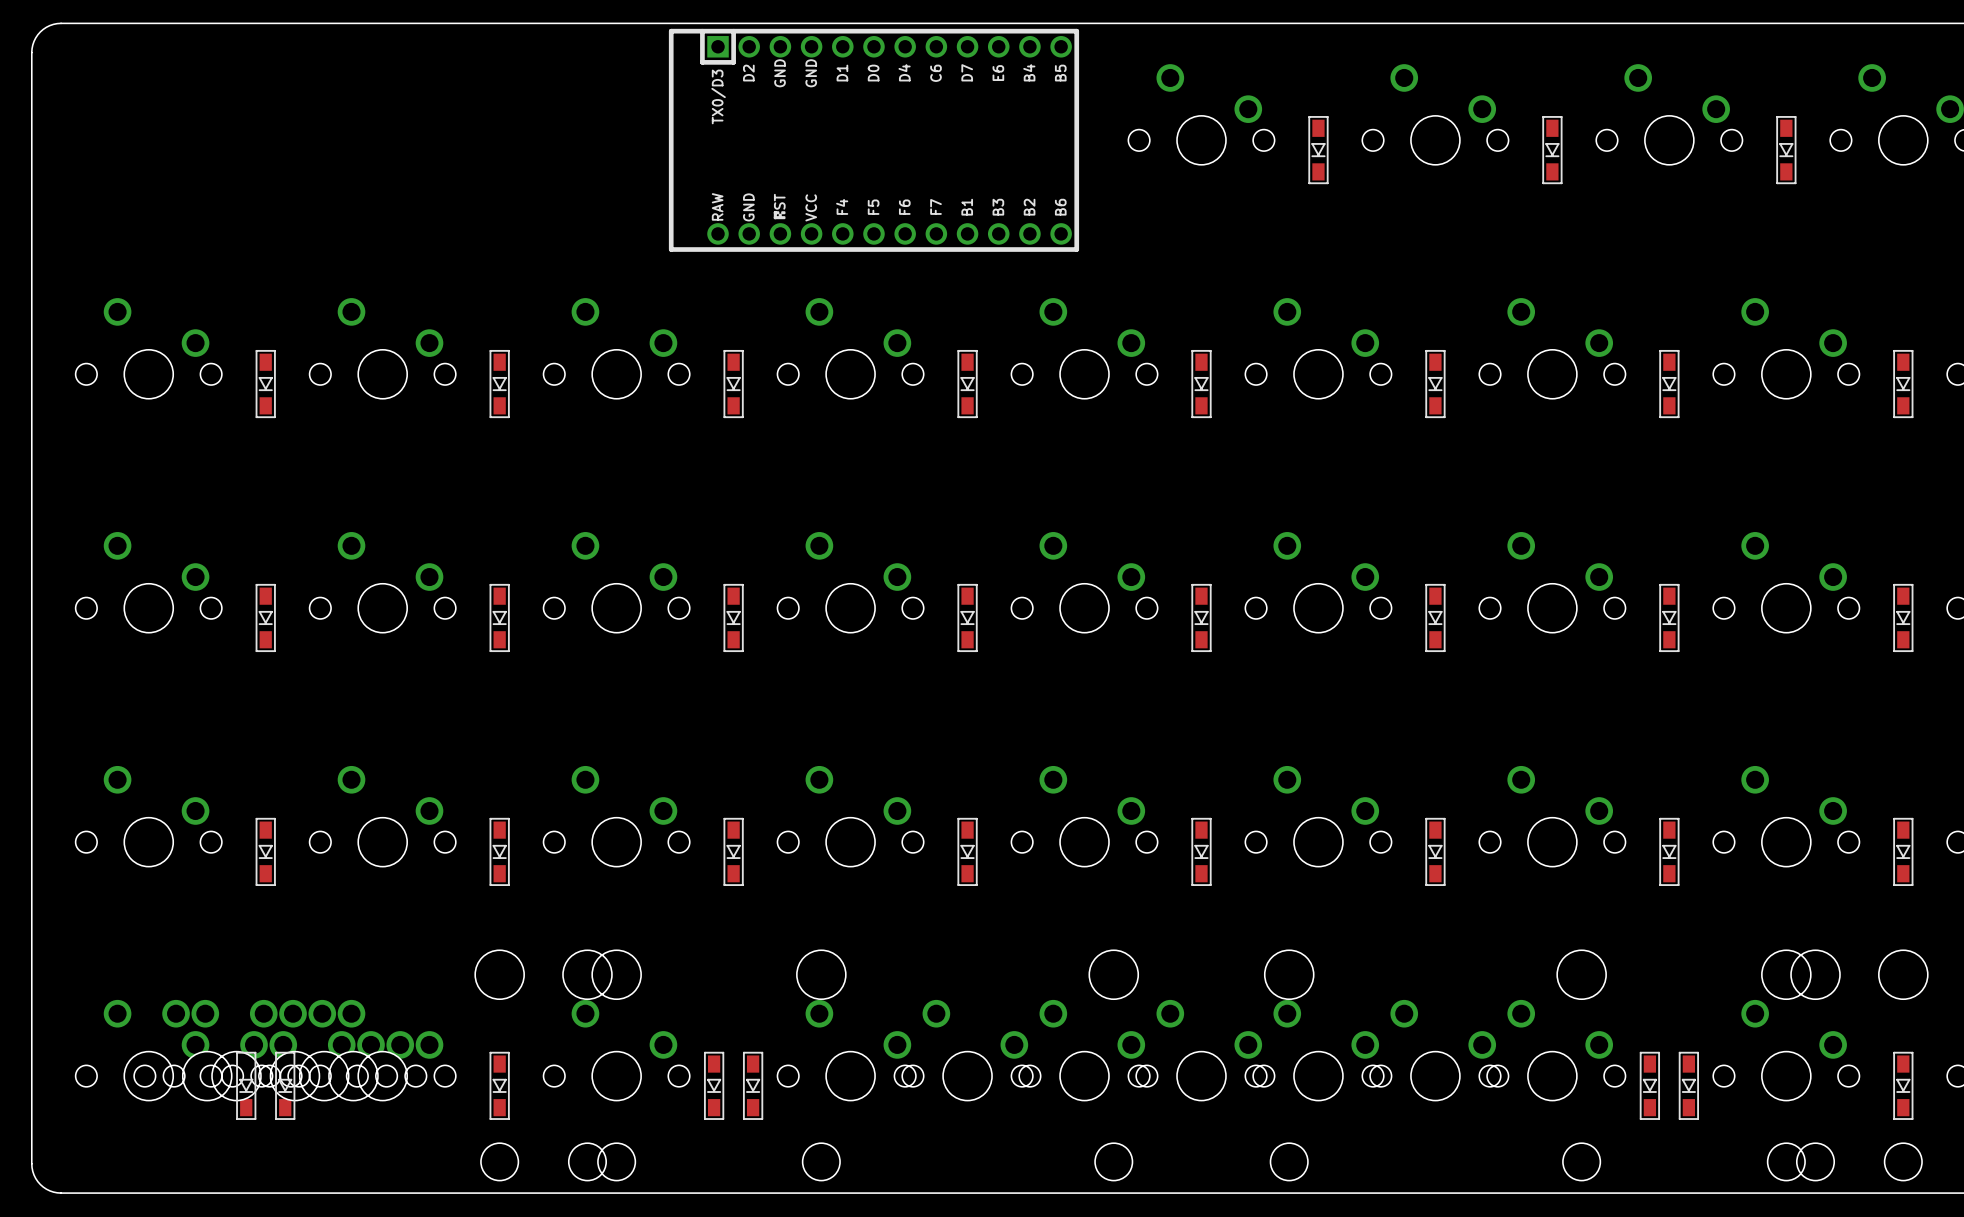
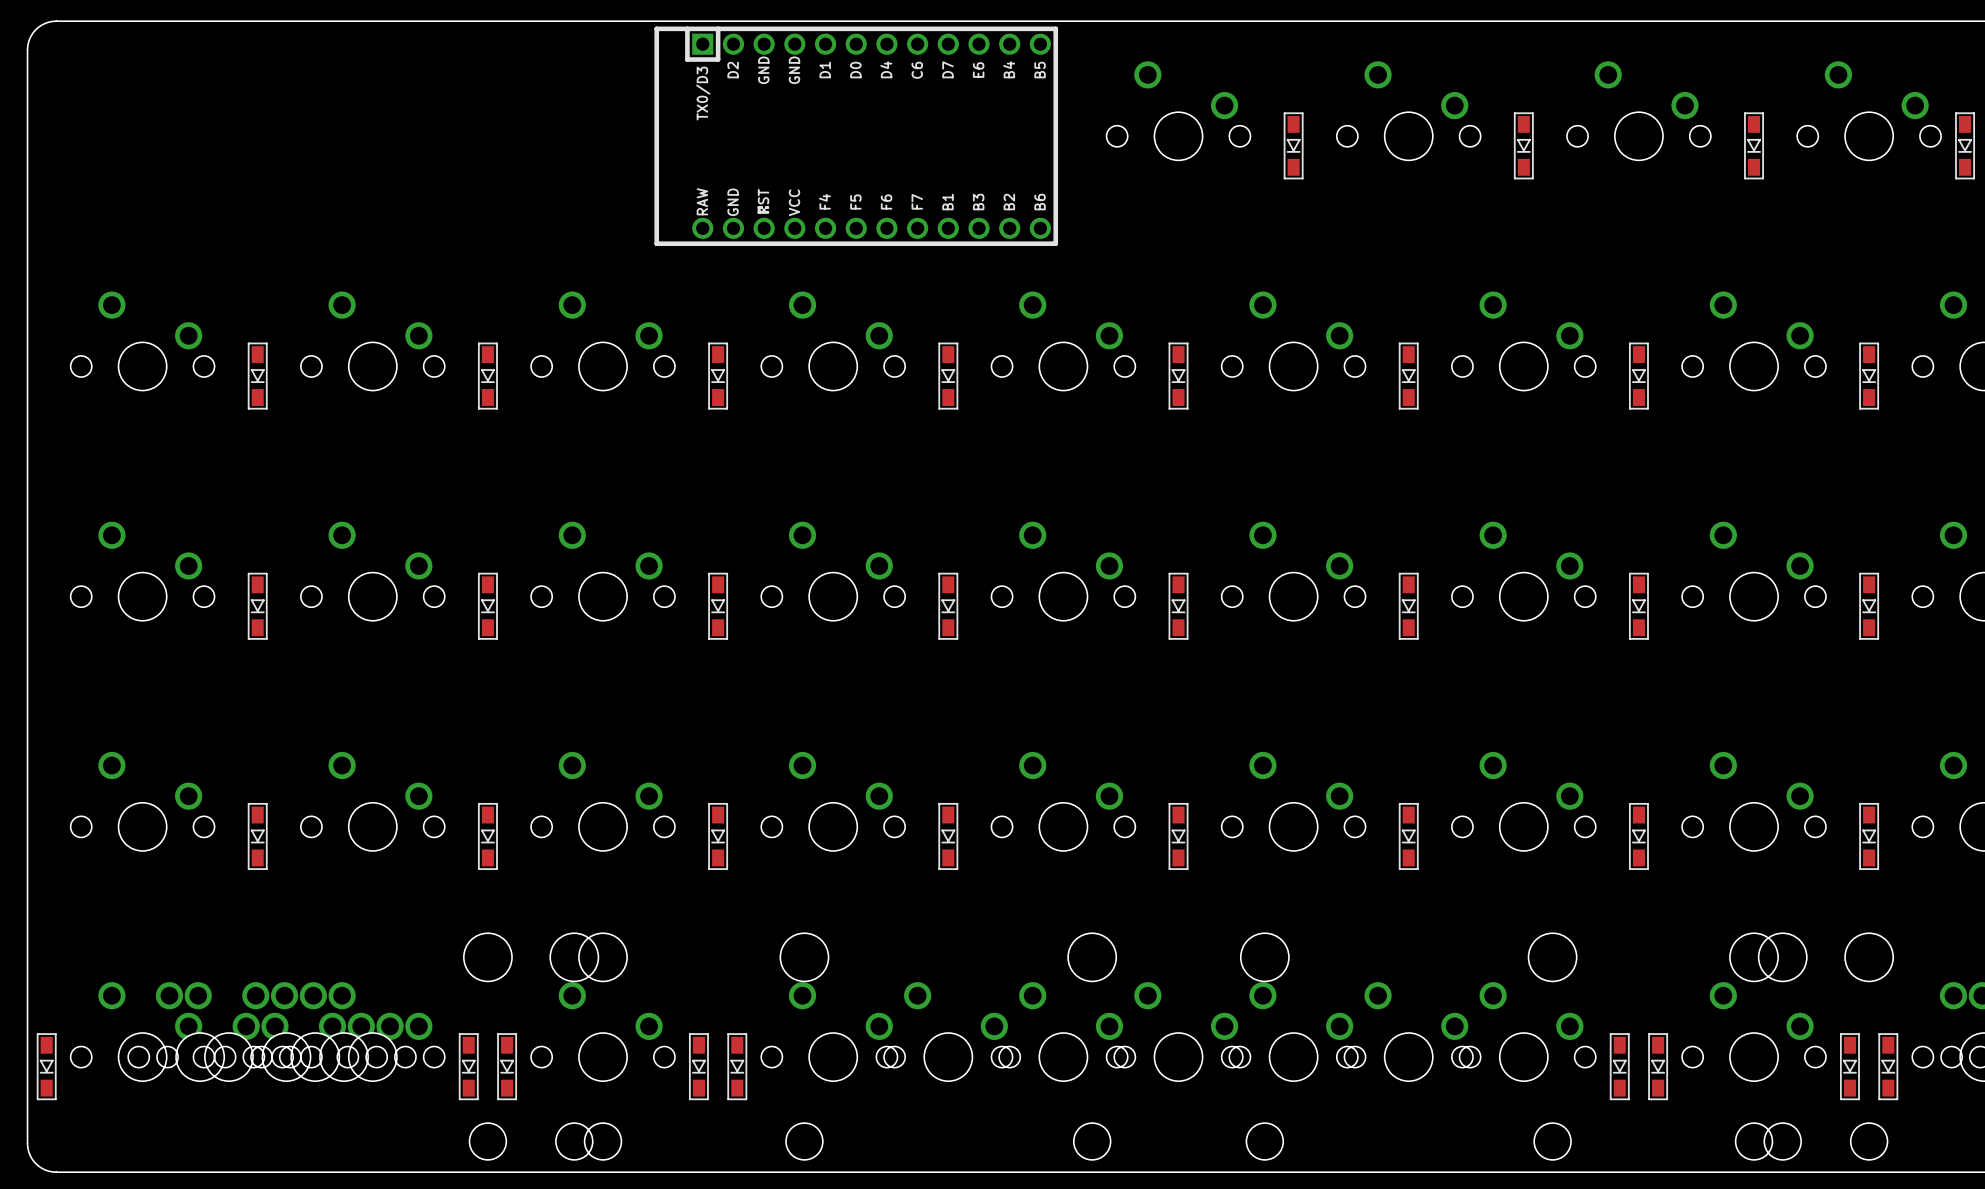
part: none -> (46, 1066)
part: (246, 1085) -> none
part: (285, 1085) -> none
part: none -> (468, 1066)
part: (499, 1085) -> none
part: none -> (507, 1066)
part: none -> (1849, 1066)
part: (1903, 1085) -> none
part: none -> (1888, 1066)

